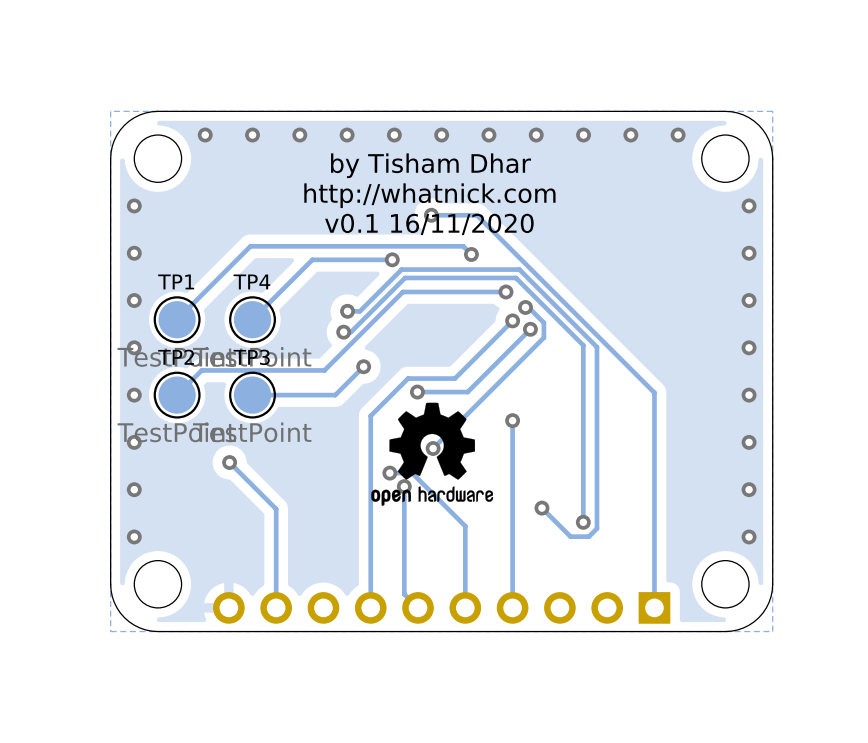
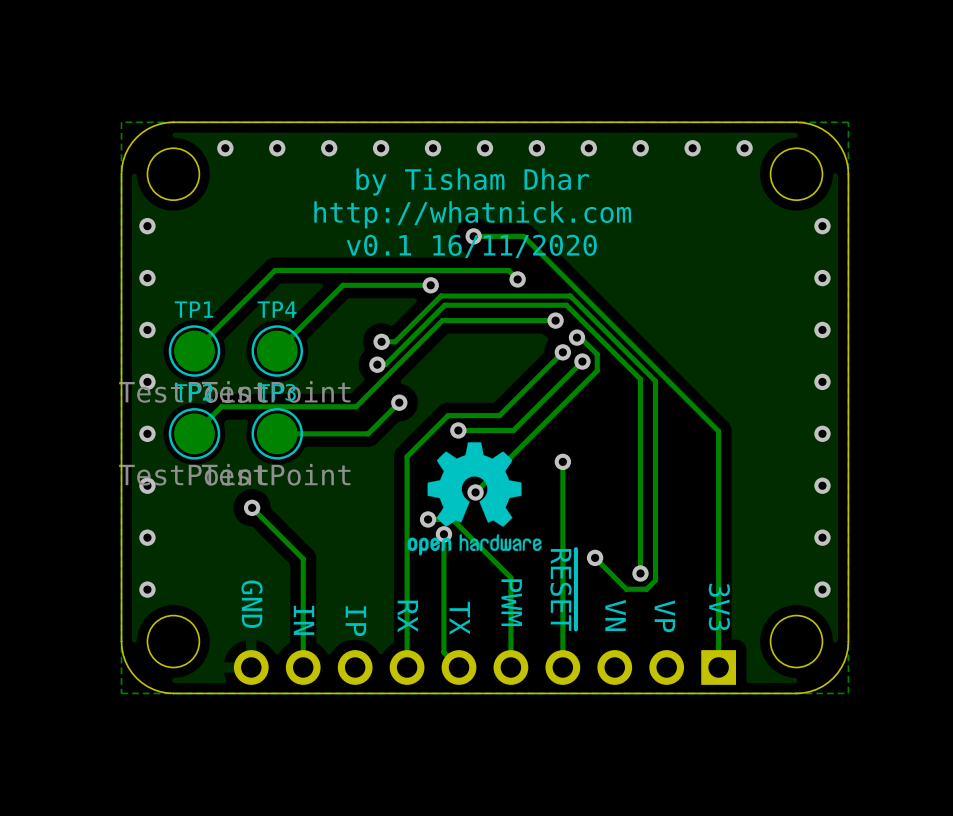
text: none -> ~{RESET} (563, 589)
text: none -> PWM (511, 602)
text: none -> GND (252, 604)
text: none -> 3V3 (719, 607)
text: none -> VN (615, 615)
text: none -> RX (407, 616)
text: none -> VP (664, 616)
text: none -> TX (459, 618)
text: none -> IN (303, 620)
text: none -> IP (355, 621)

